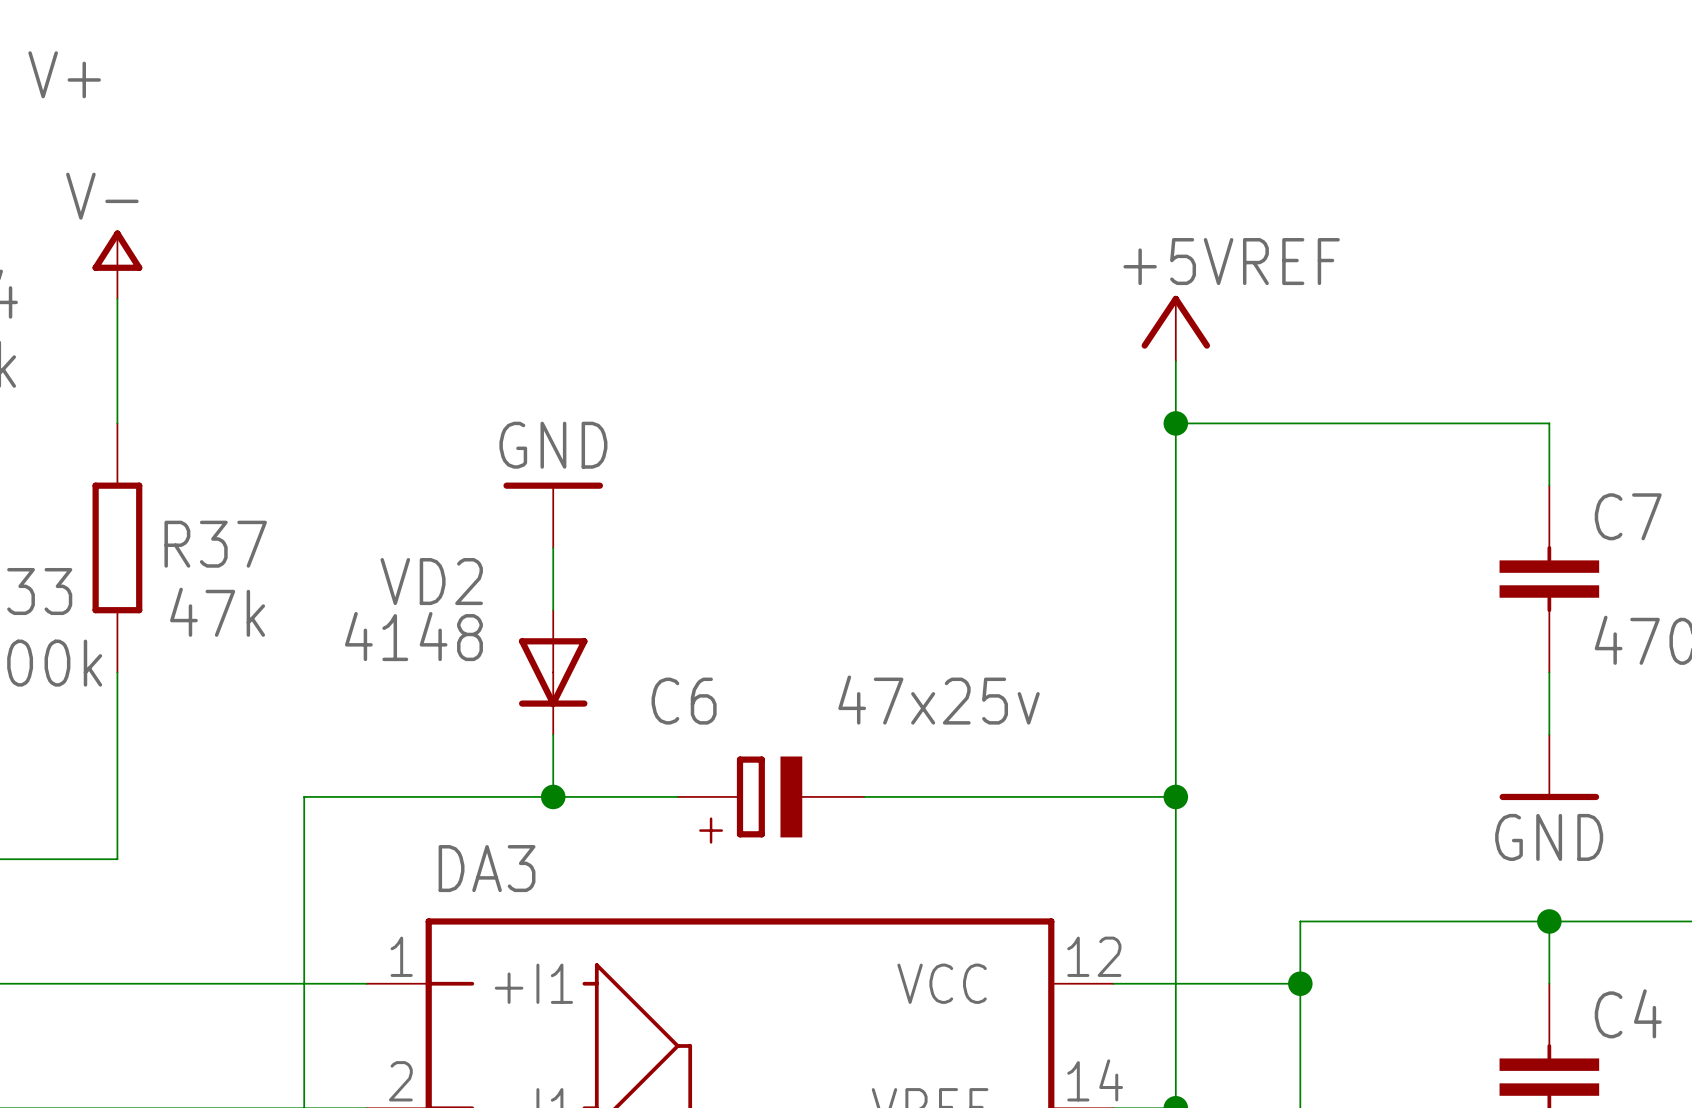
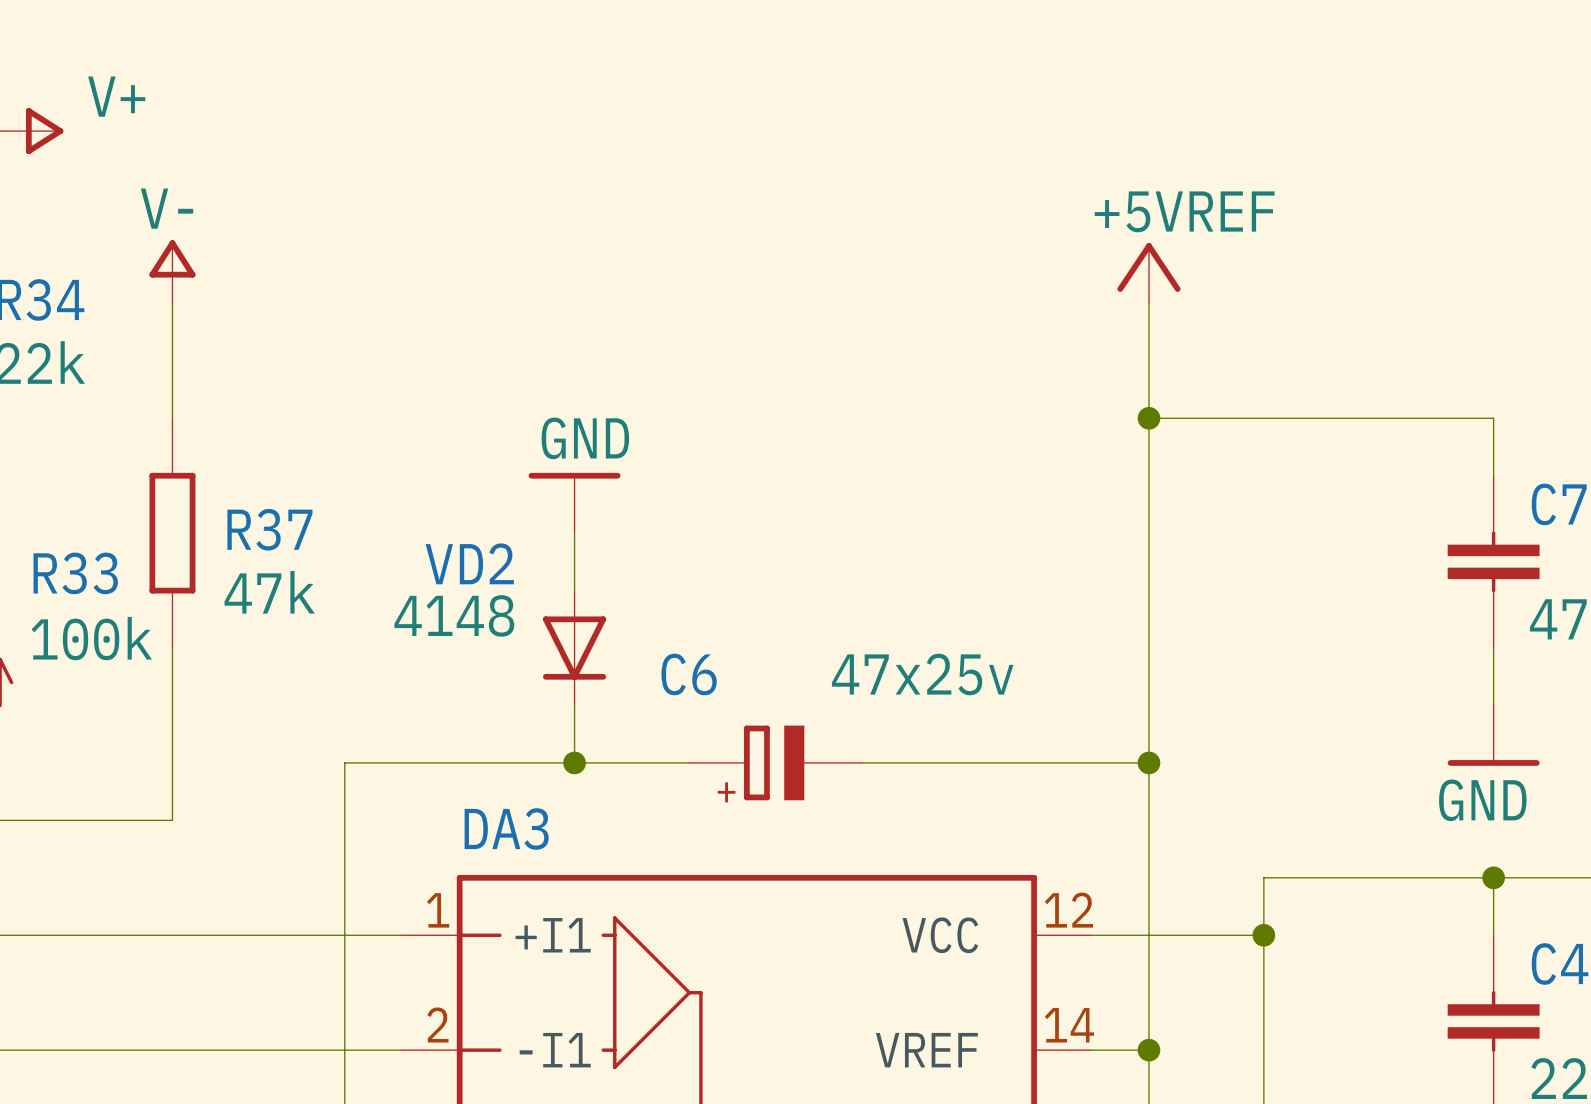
power symbol position: +5VREF (1175, 328) -> +5VREF (1148, 273)

